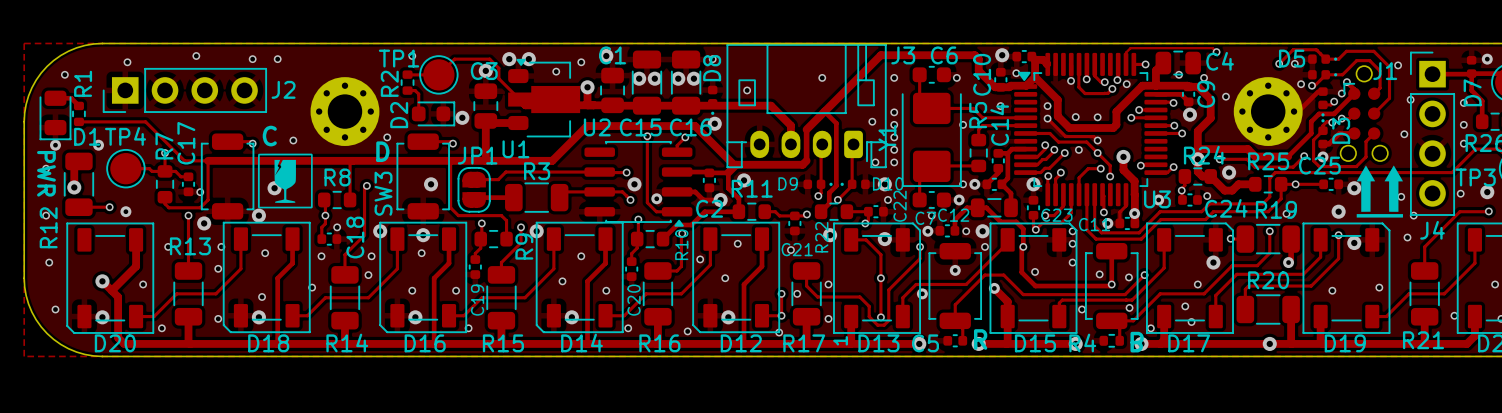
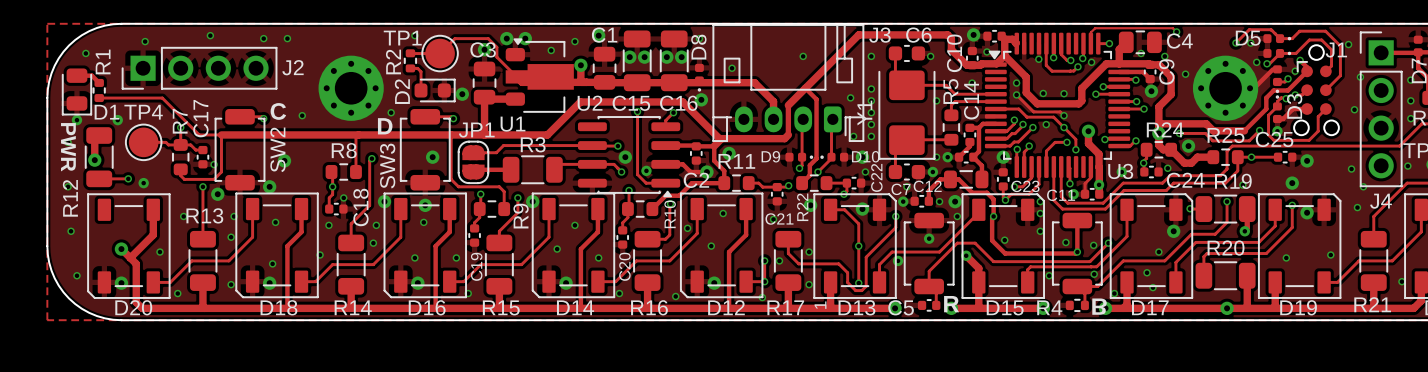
drawing: [257, 153, 313, 209] -> none
drawing: [1356, 165, 1403, 218] -> none
SW2 name: none -> SW2 (277, 149)

